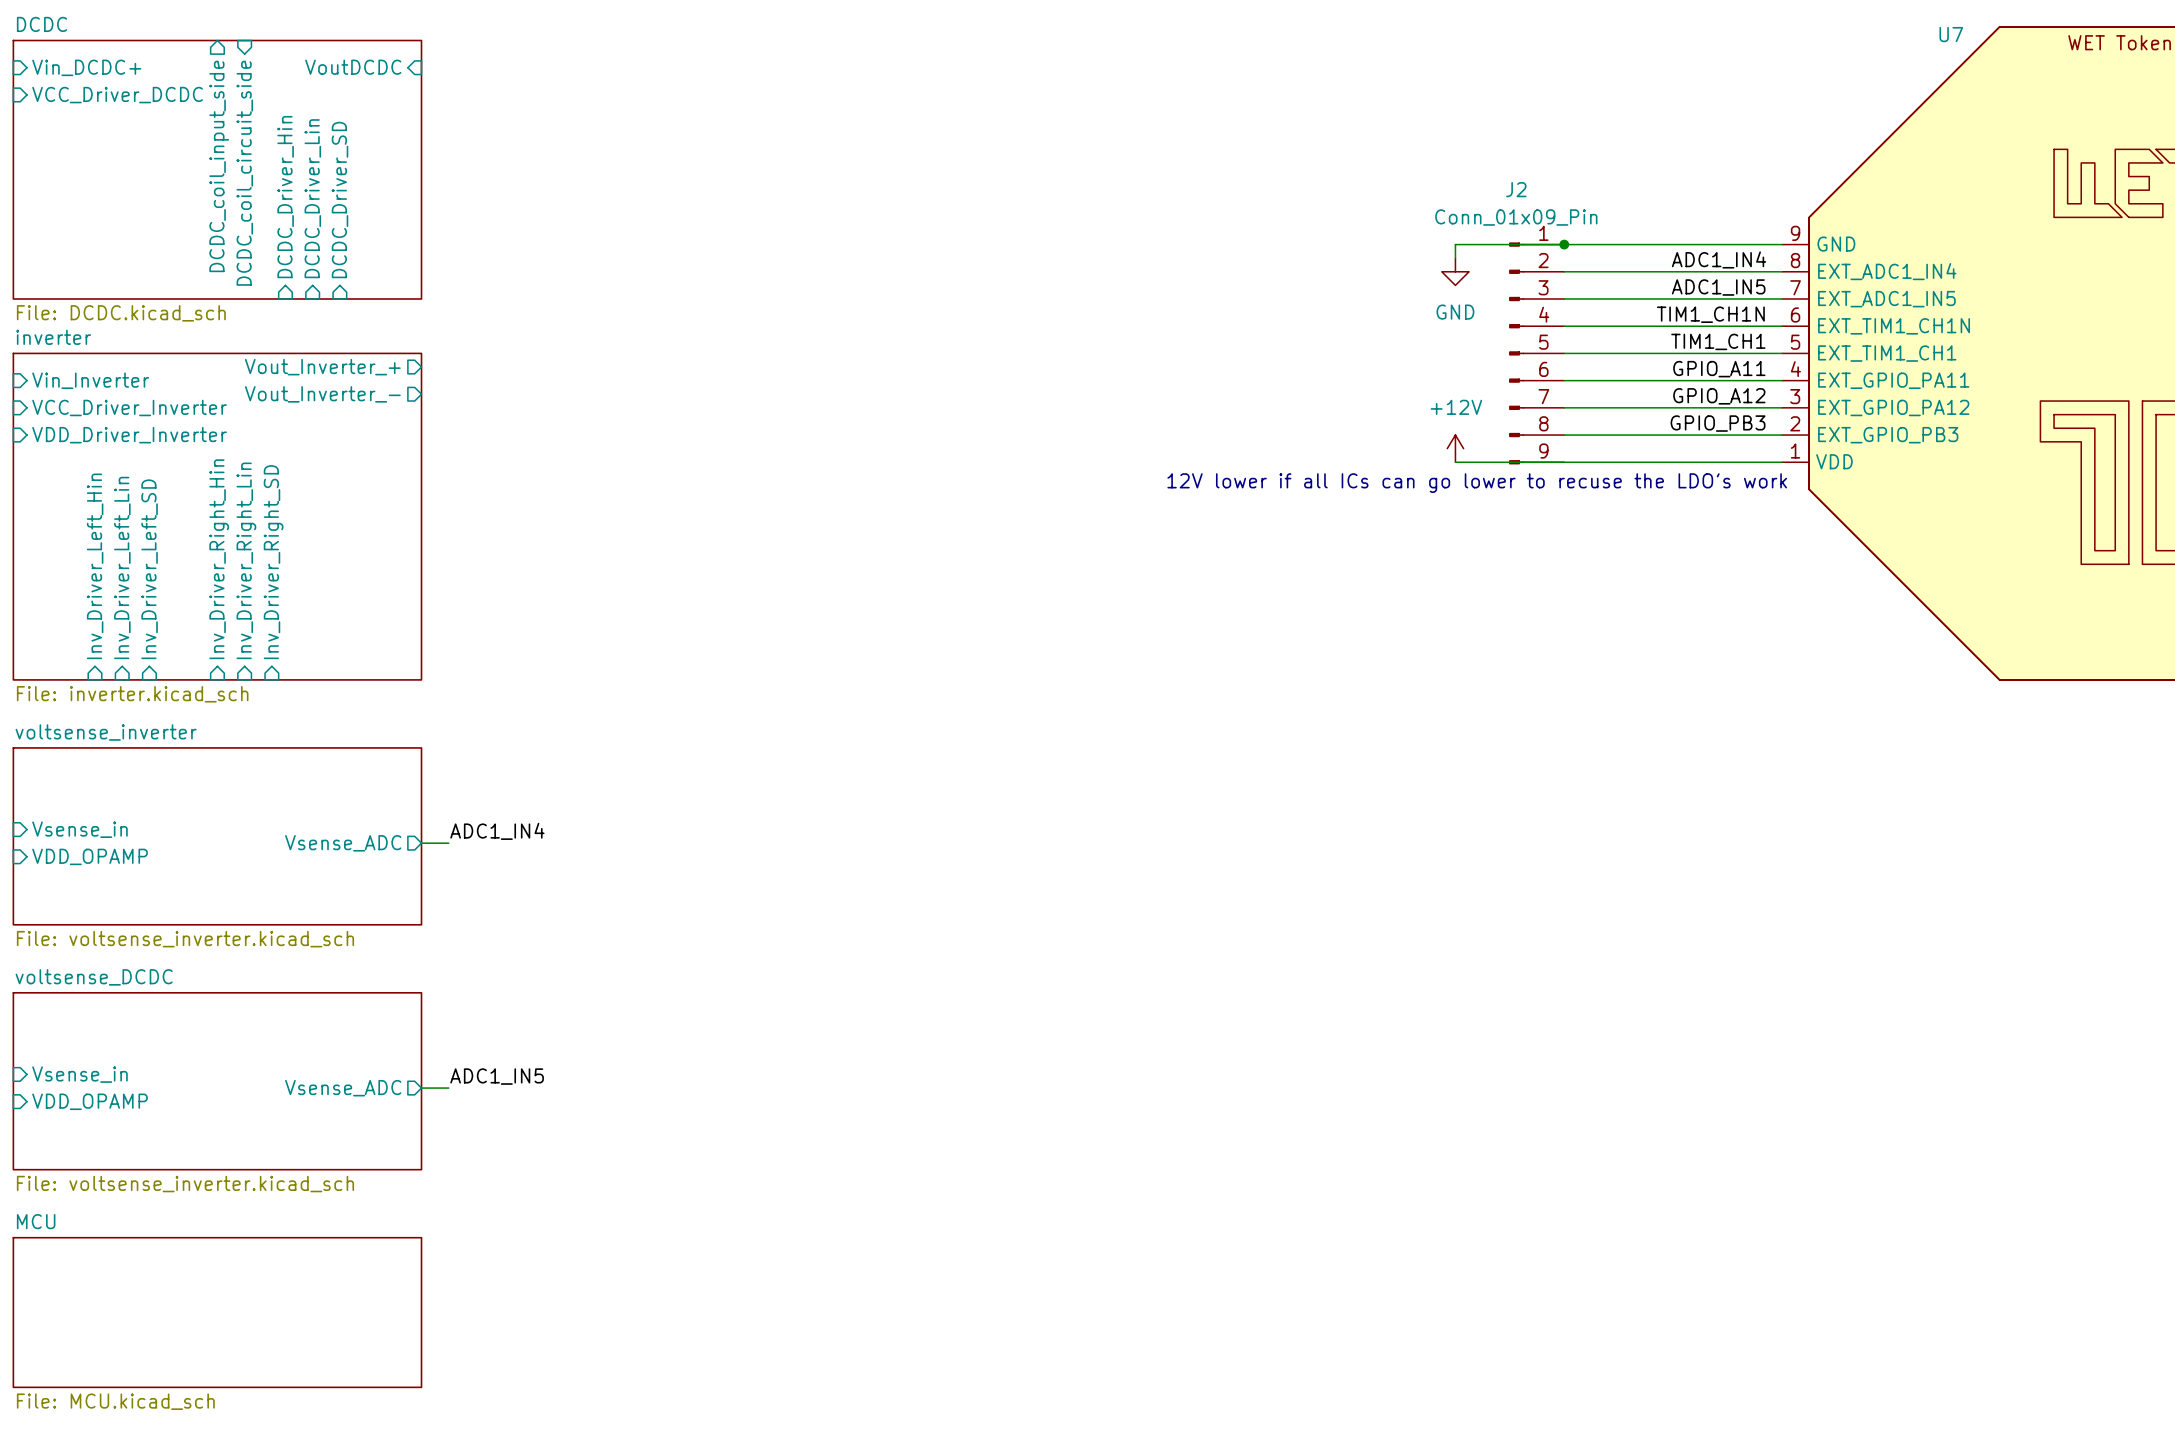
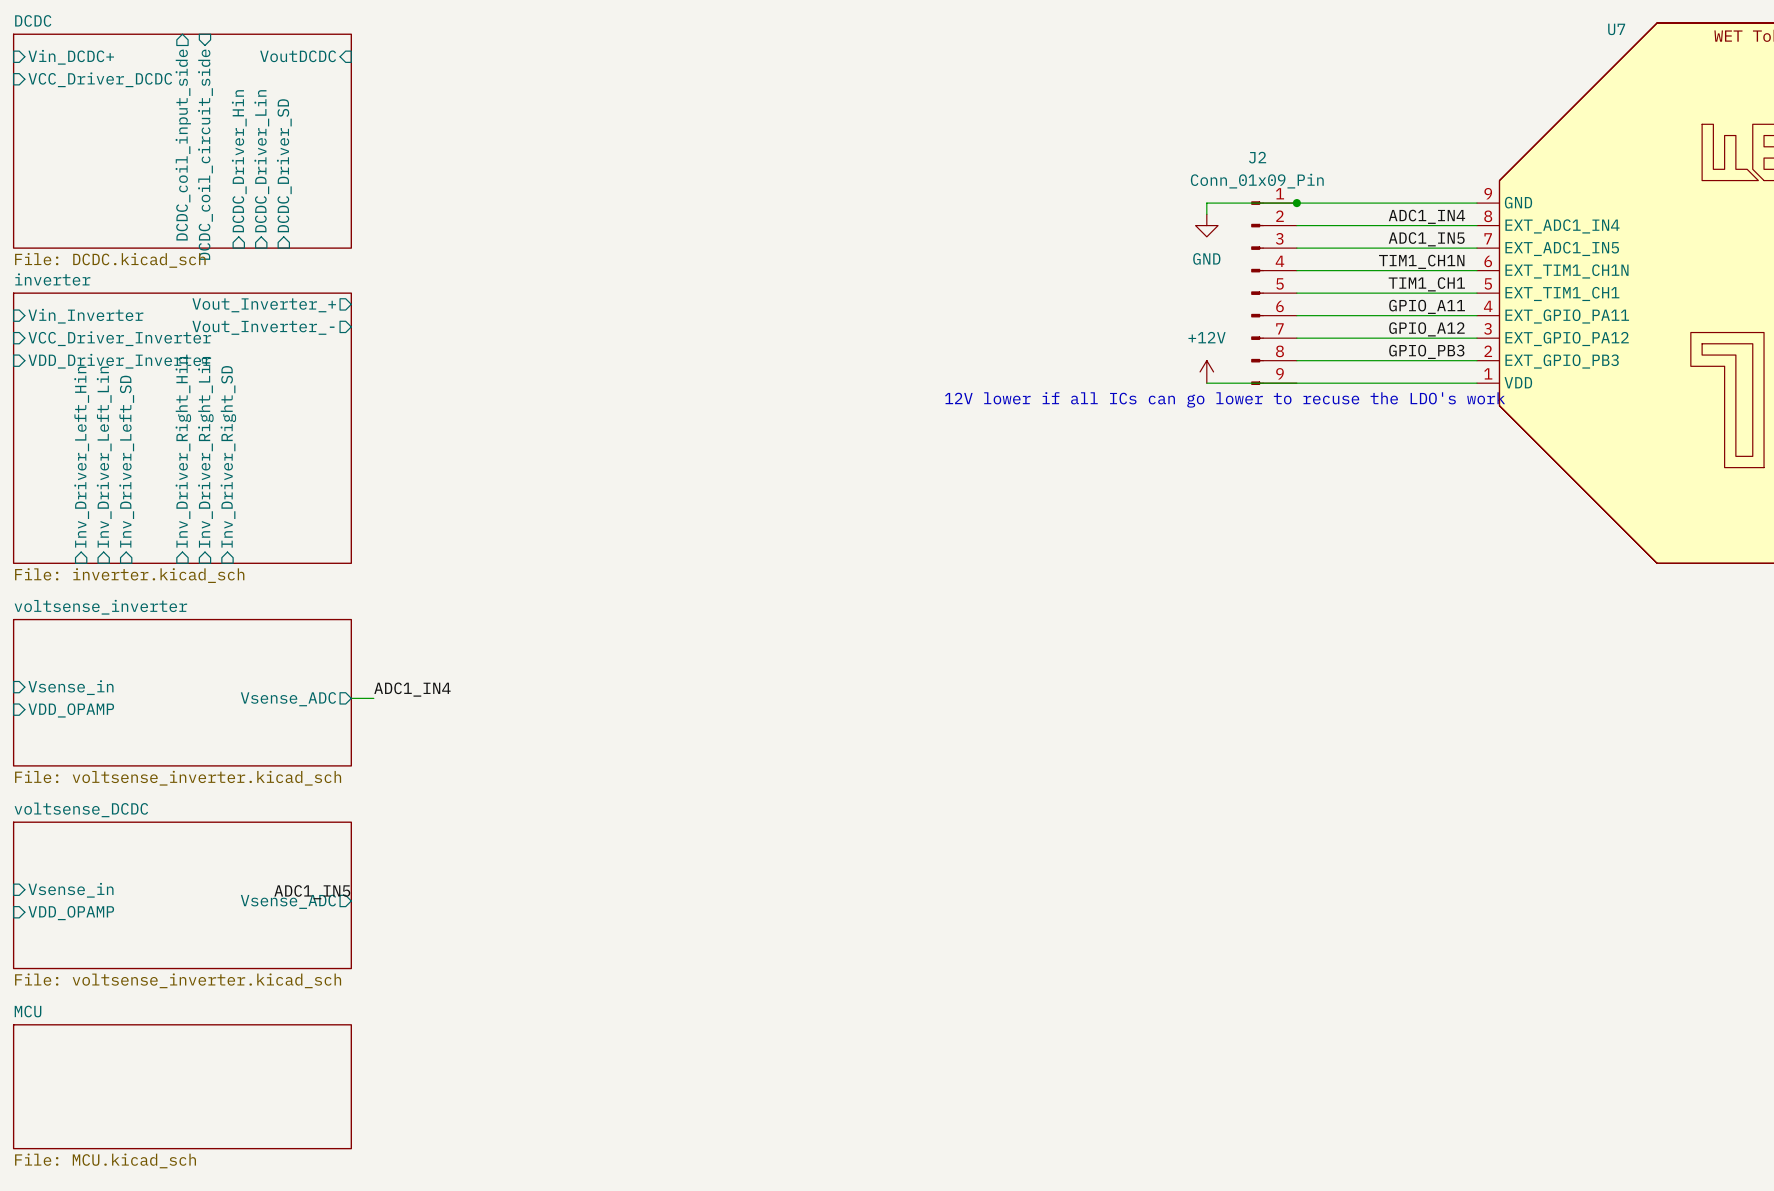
label position: ADC1_IN5 (497, 1076) -> ADC1_IN5 (312, 892)
wire: (421, 1088) (448, 1088) -> none

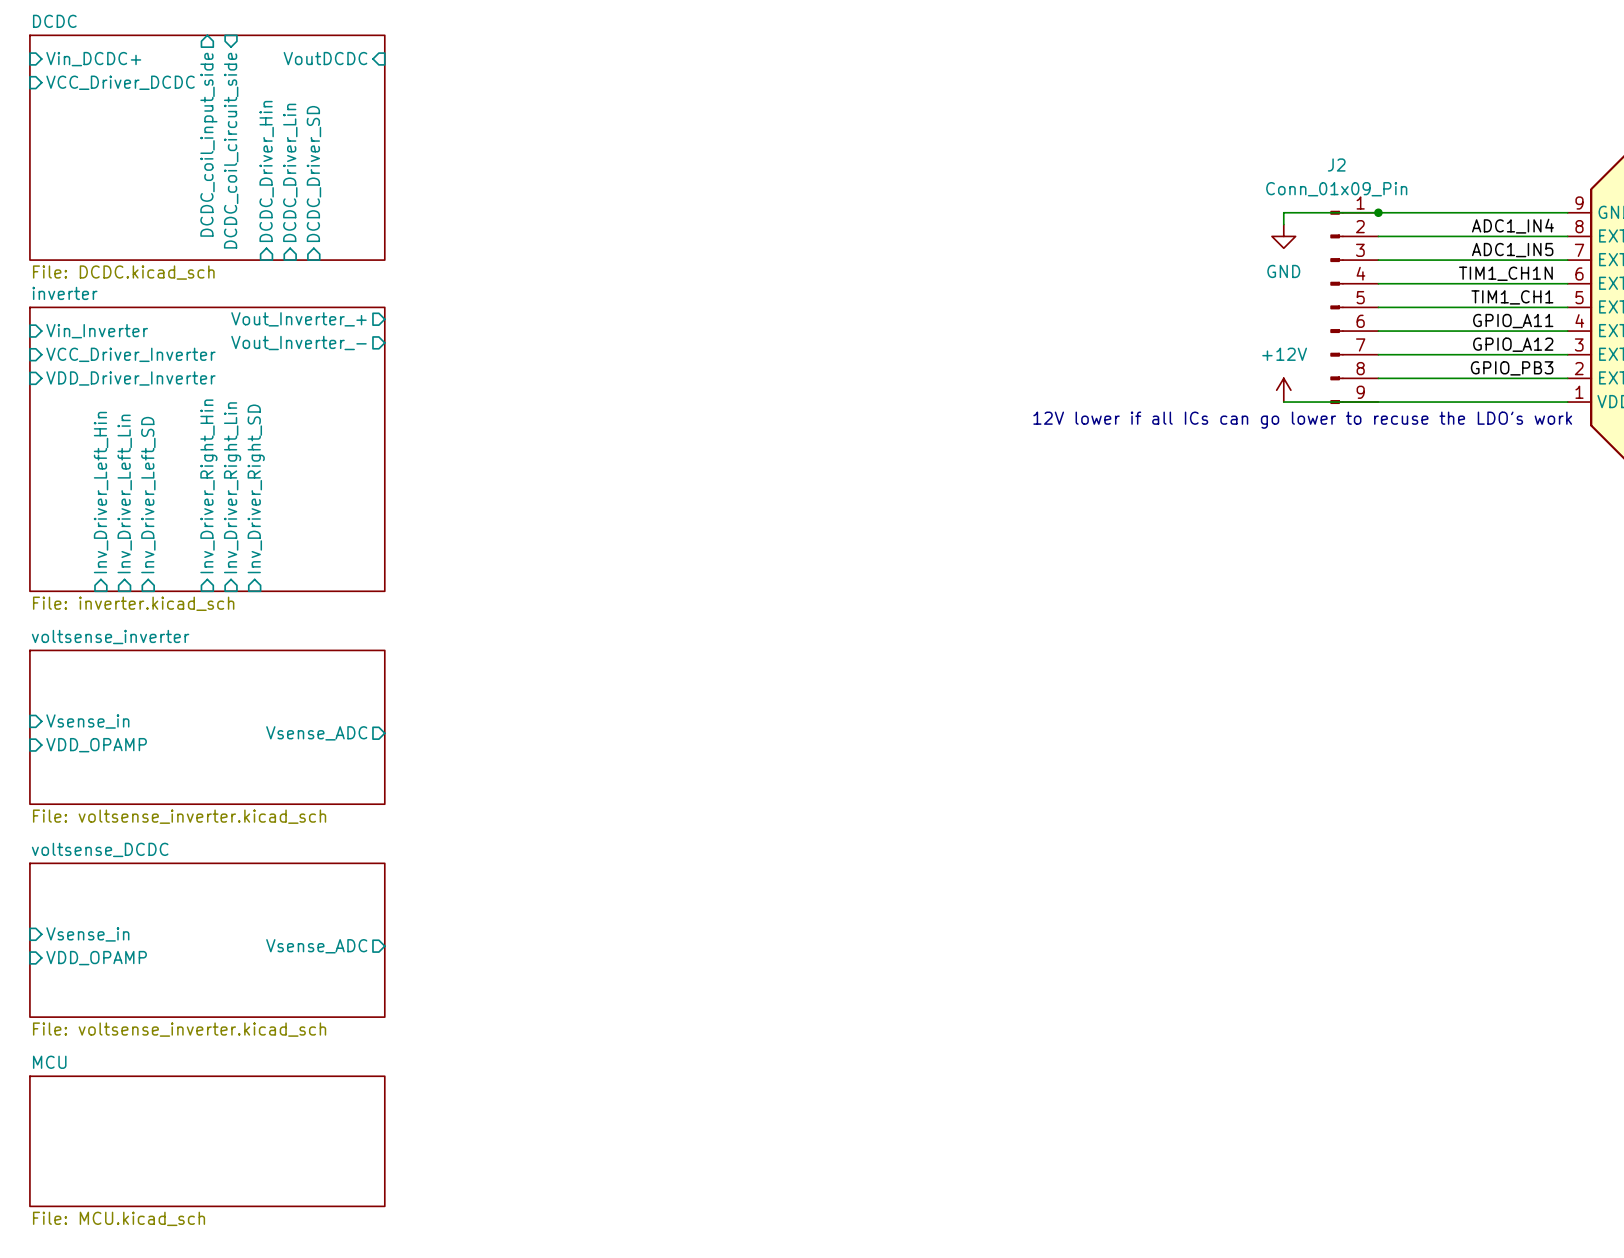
label: ADC1_IN4 (412, 689) -> none
wire: (351, 698) (373, 698) -> none
label: ADC1_IN5 (312, 892) -> none

